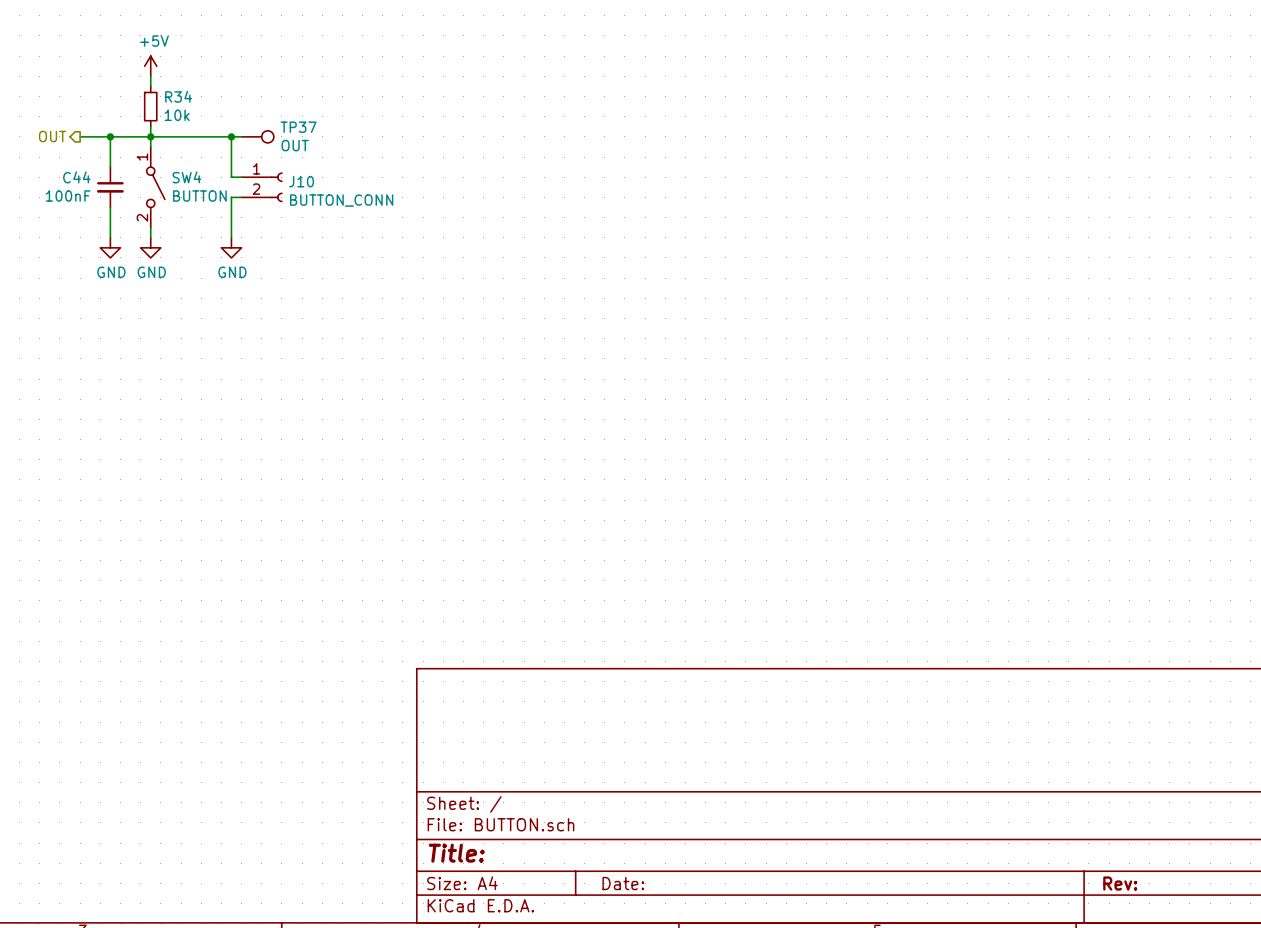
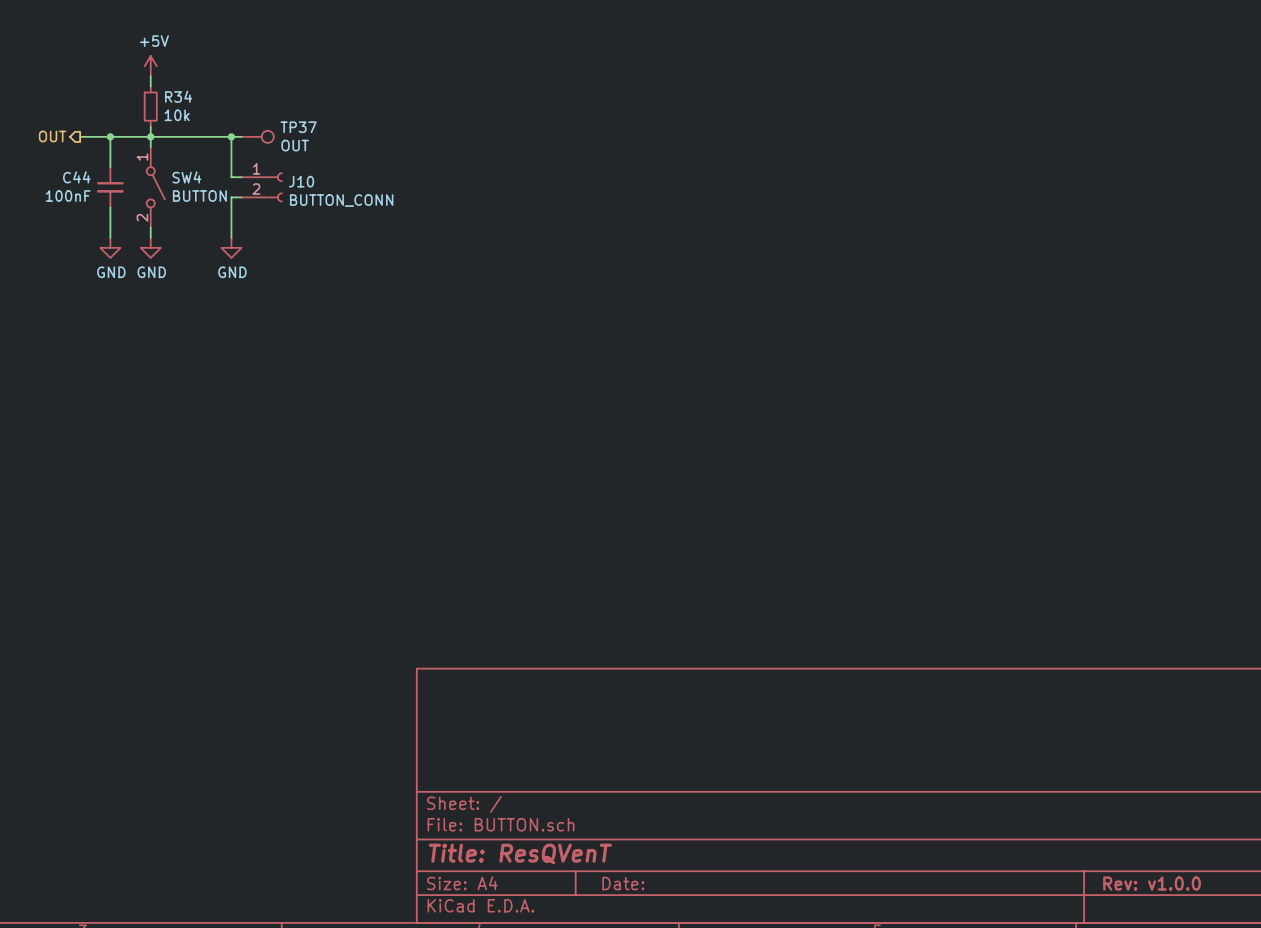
title block: Title: (456, 853) -> Title: ResQVenT (520, 853)
title block: Rev: (1120, 883) -> Rev: v1.0.0 (1152, 883)

